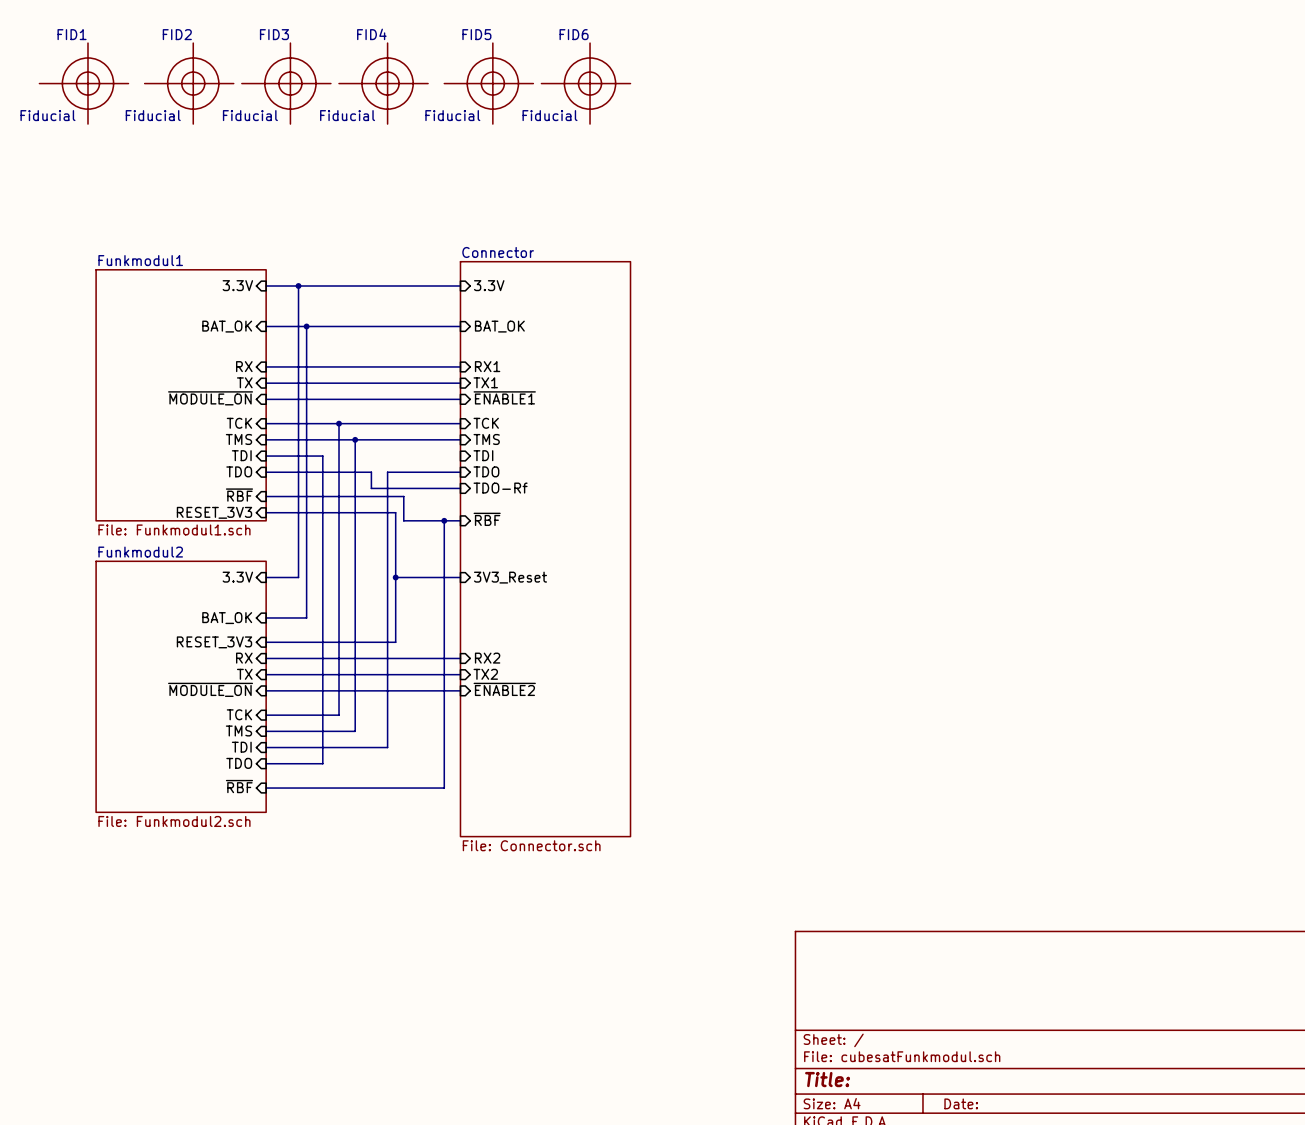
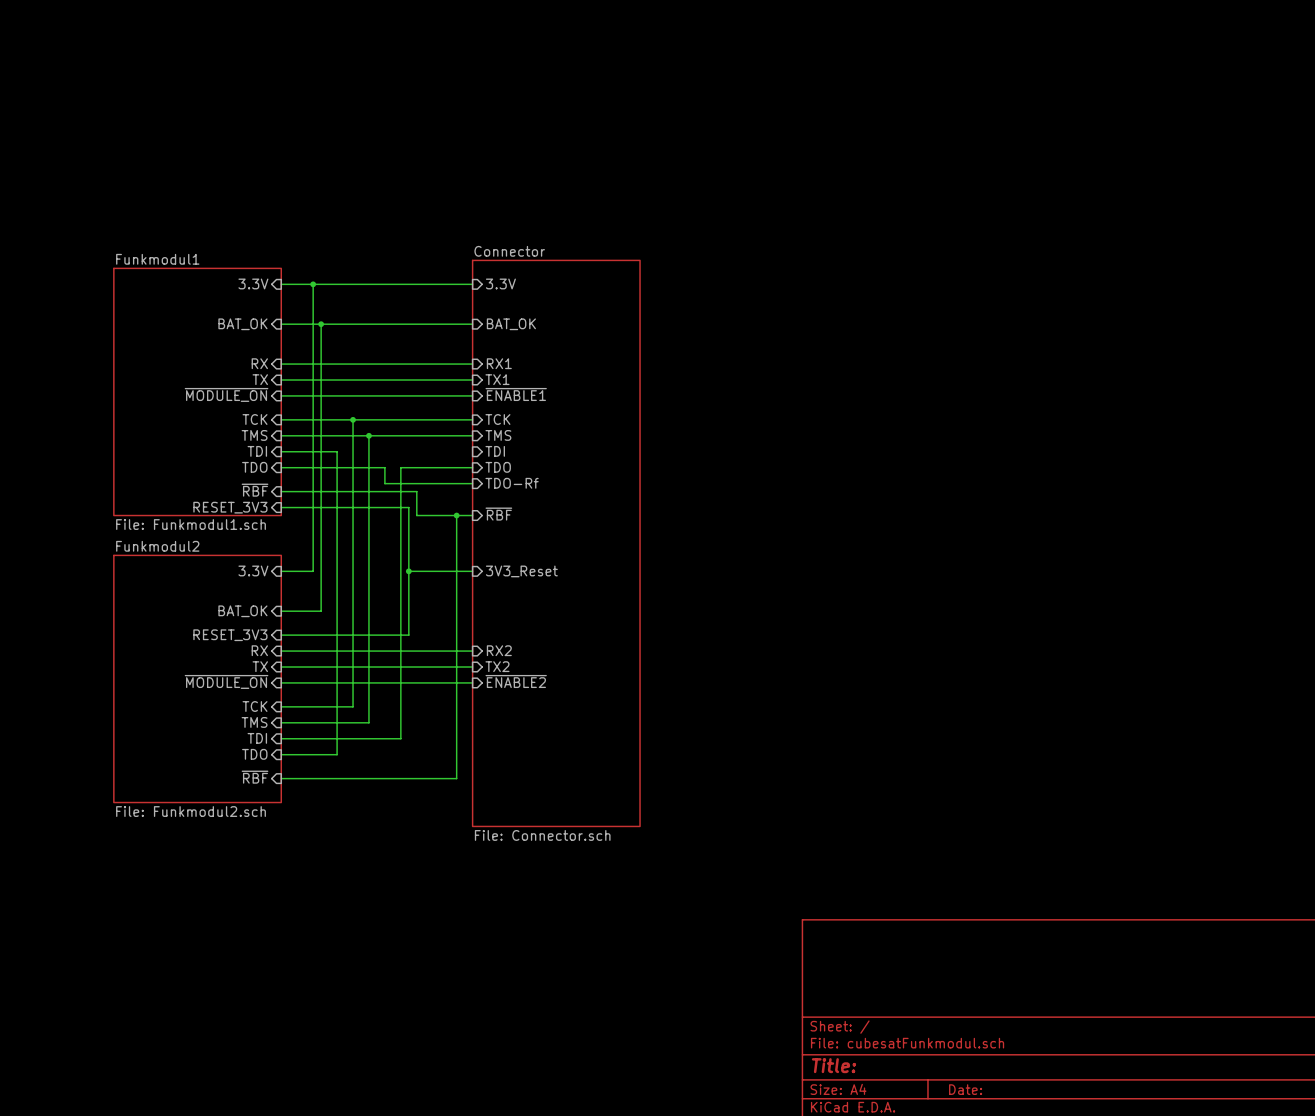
FID1: Fiducial (83, 83) -> none
FID2: Fiducial (189, 83) -> none
FID3: Fiducial (286, 83) -> none
FID4: Fiducial (383, 83) -> none
FID5: Fiducial (488, 83) -> none
FID6: Fiducial (585, 83) -> none

